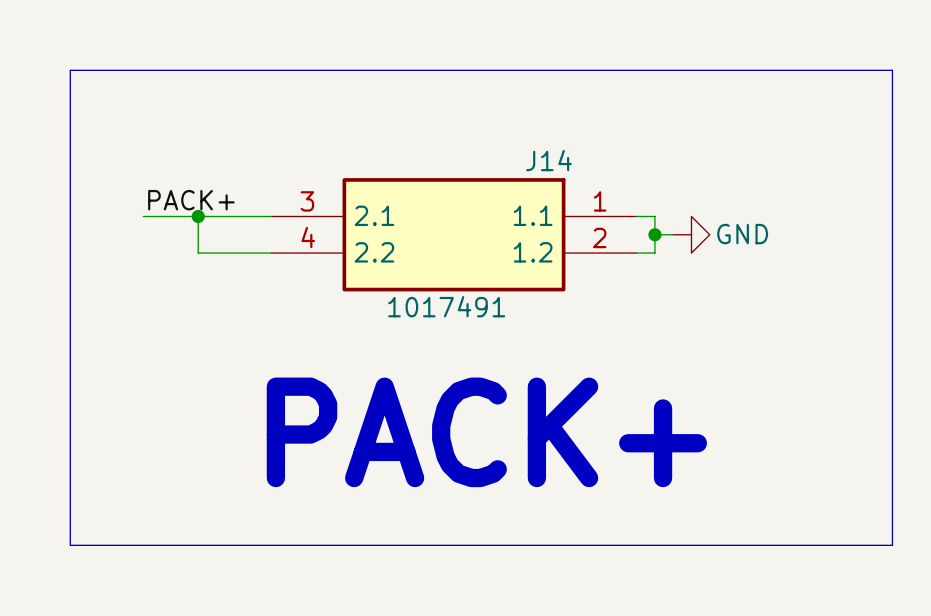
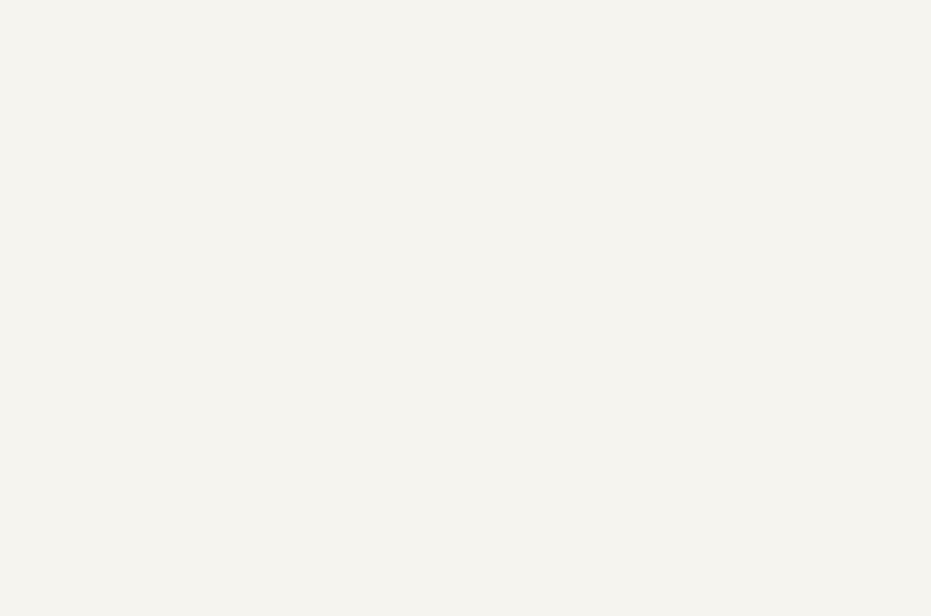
line: (70, 70) (892, 70) (892, 545) (70, 545) (70, 70) -> none
label: PACK+ (191, 200) -> none
wire: (143, 216) (271, 216) -> none
wire: (198, 216) (198, 253) (271, 253) -> none
junction: (198, 216) -> none
wire: (636, 216) (654, 216) (654, 253) (636, 253) -> none
J14: 1017491 (453, 234) -> none
wire: (654, 234) (673, 234) -> none
junction: (654, 234) -> none
power symbol: GND (691, 234) -> none
text: PACK+ (486, 432) -> none

